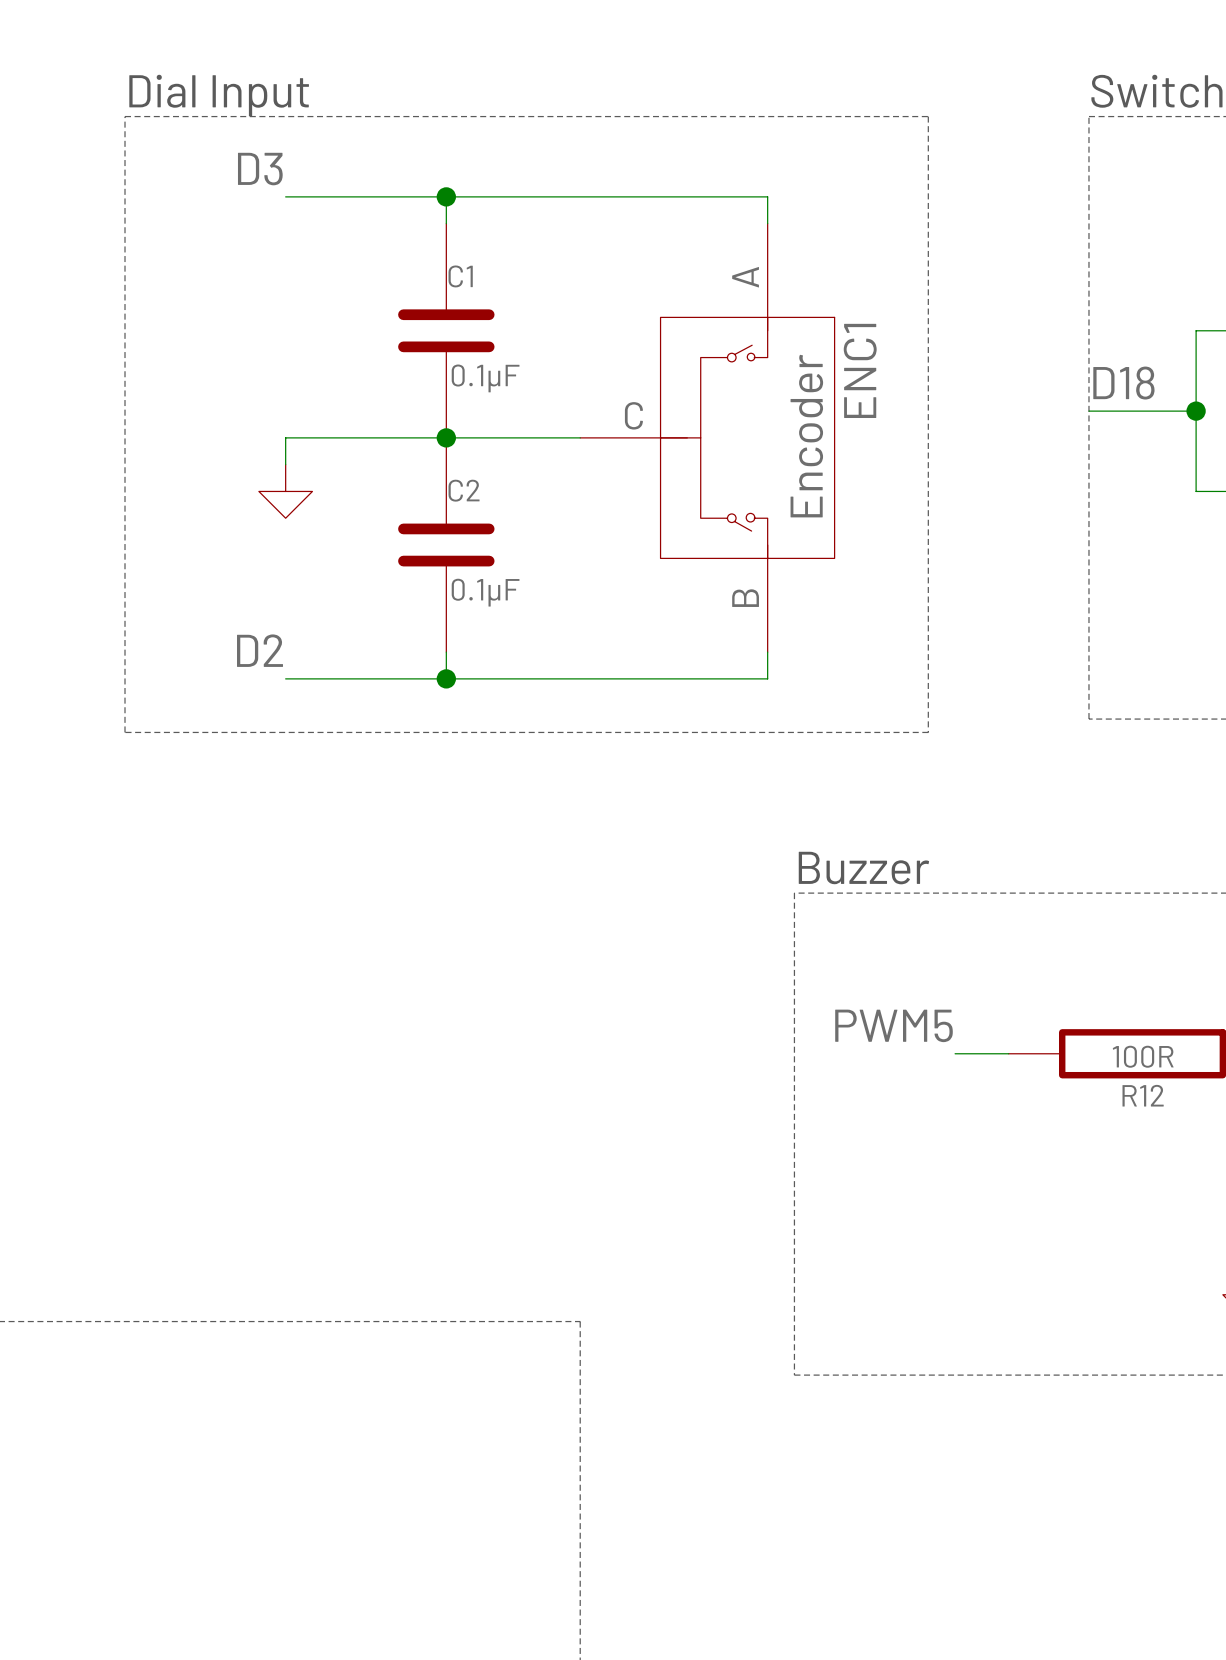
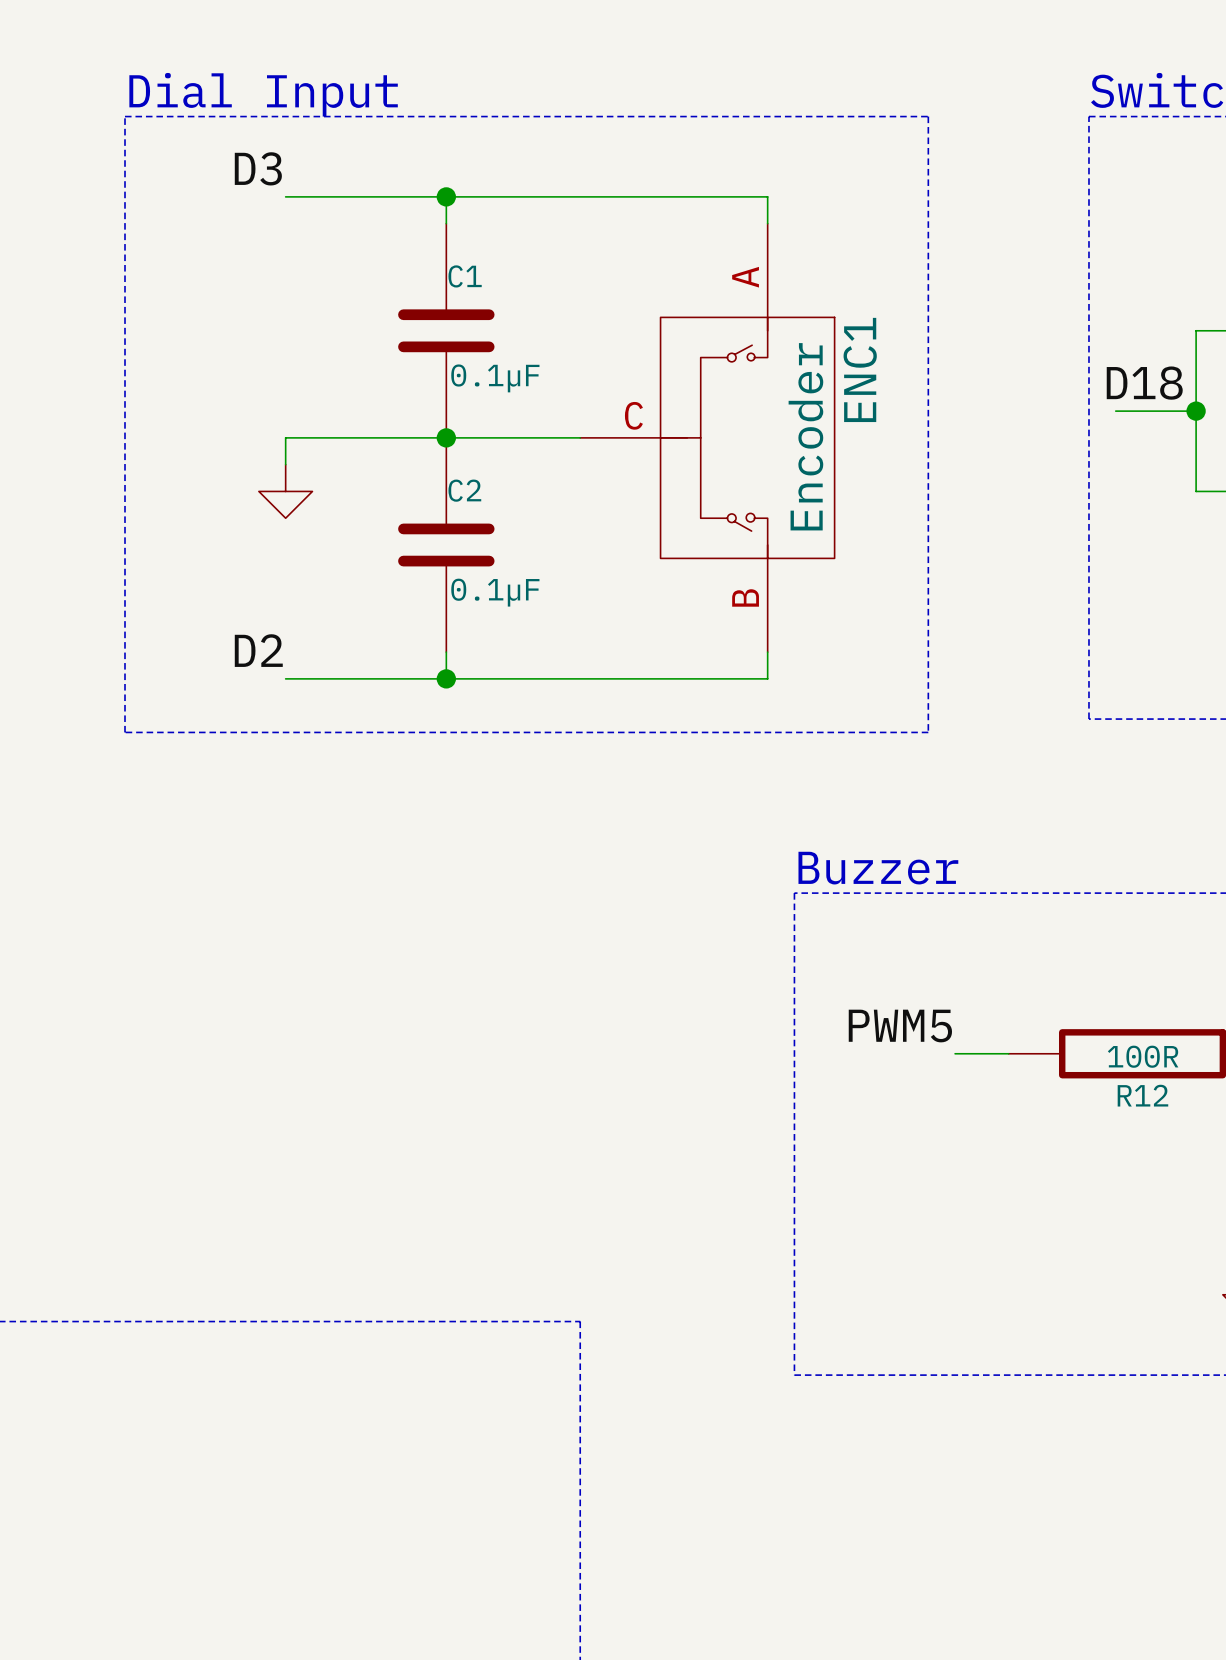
label position: D18 (1123, 383) -> D18 (1144, 383)
wire: (1088, 411) (1115, 411) -> none

